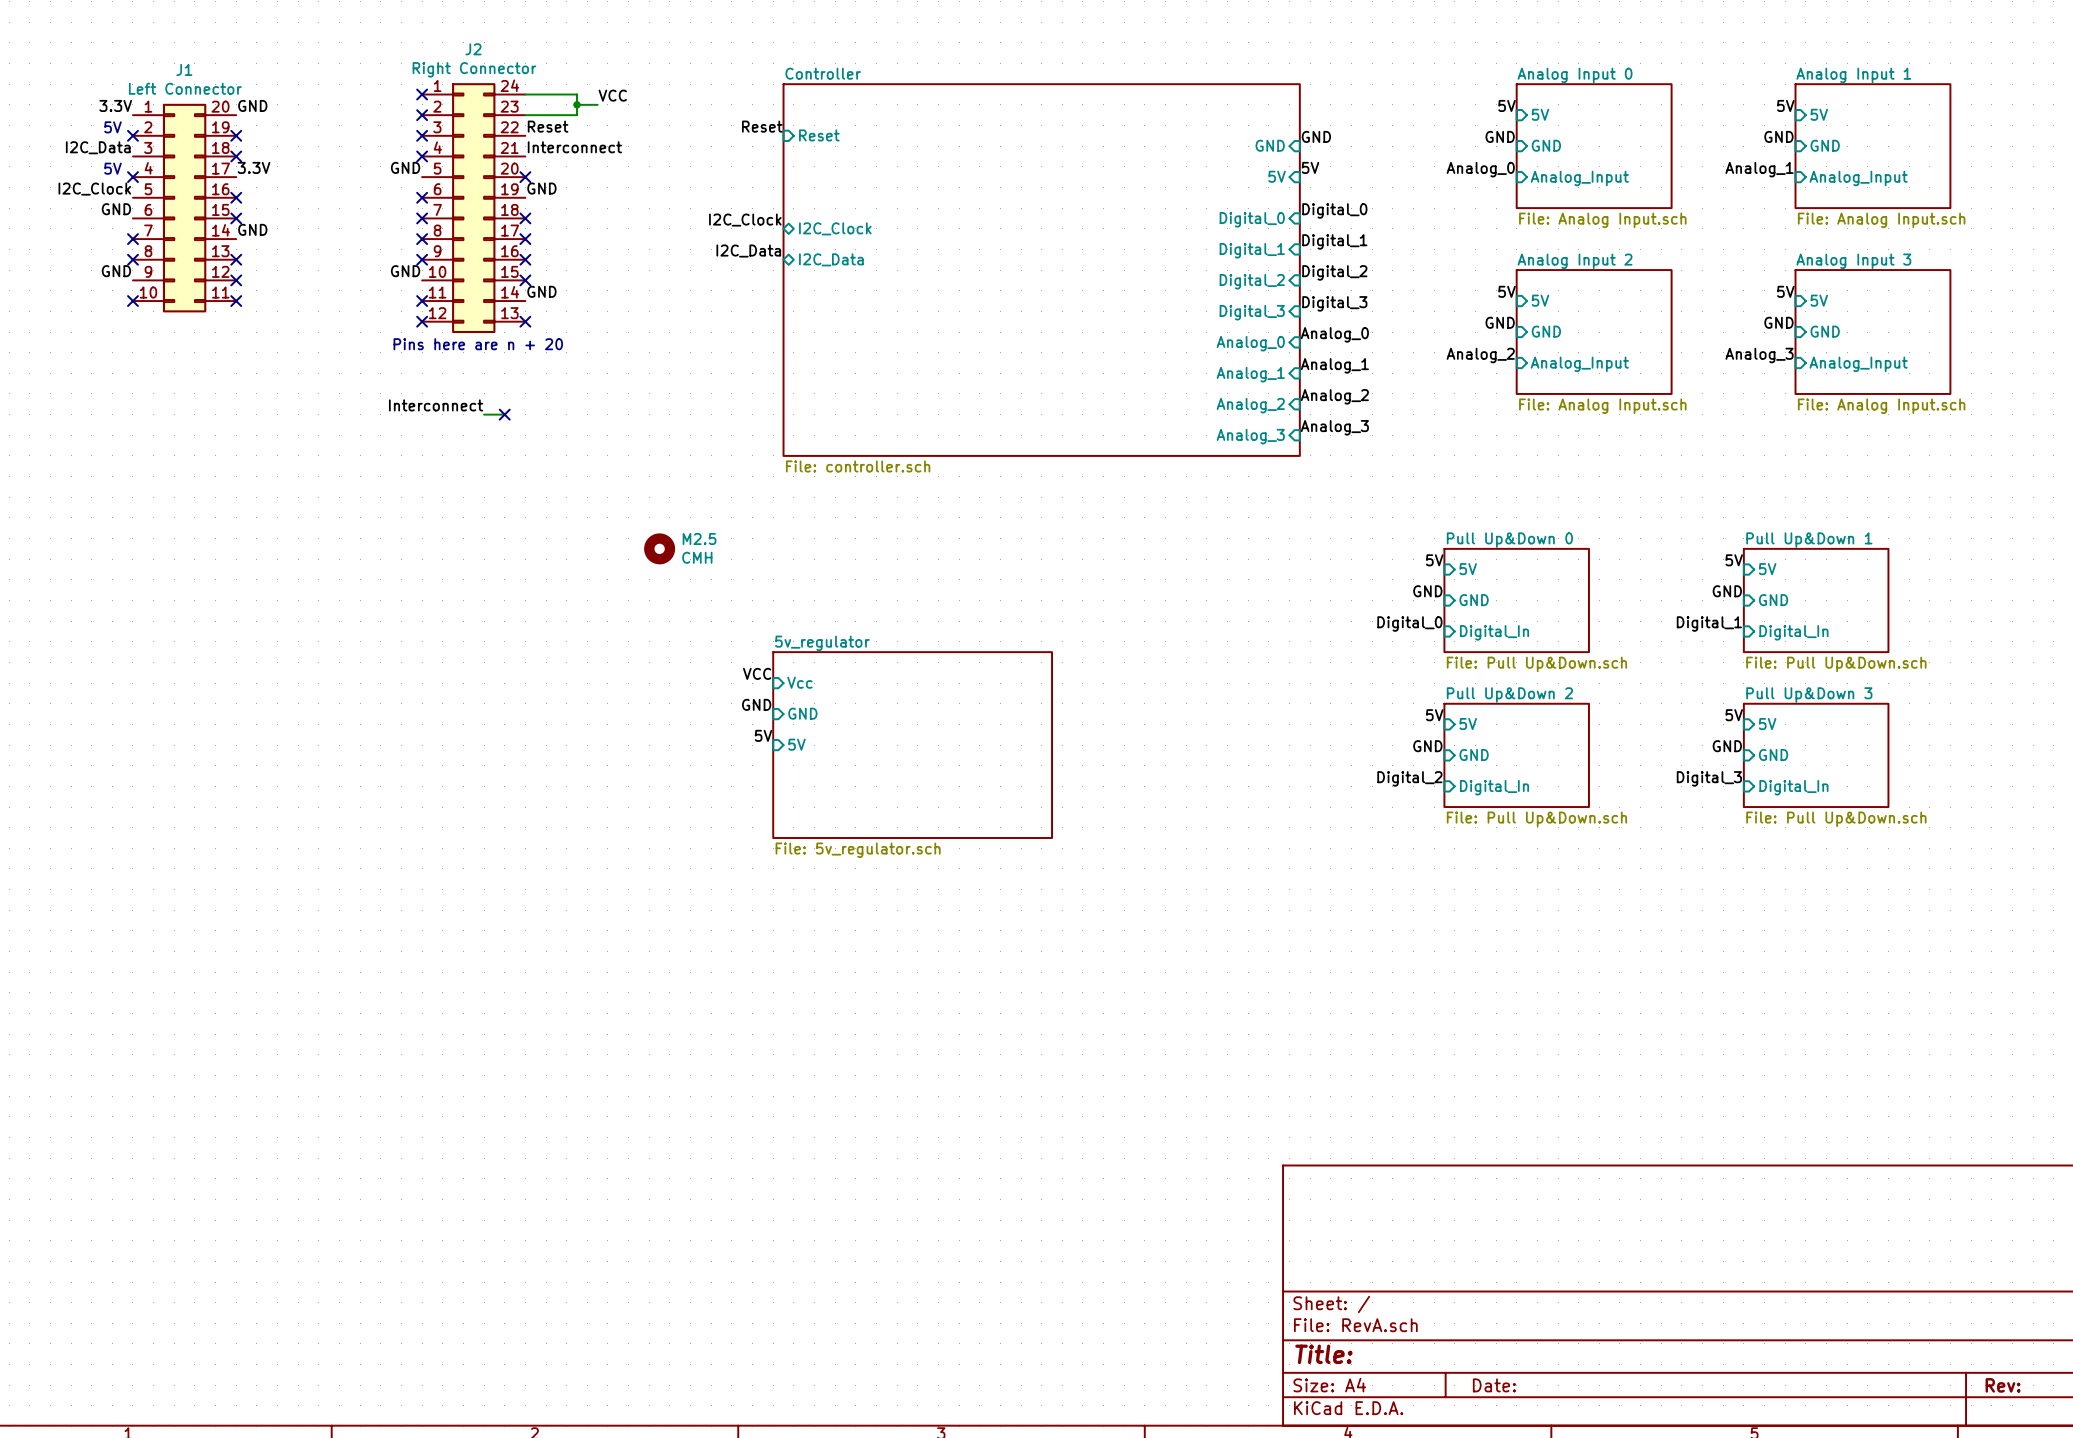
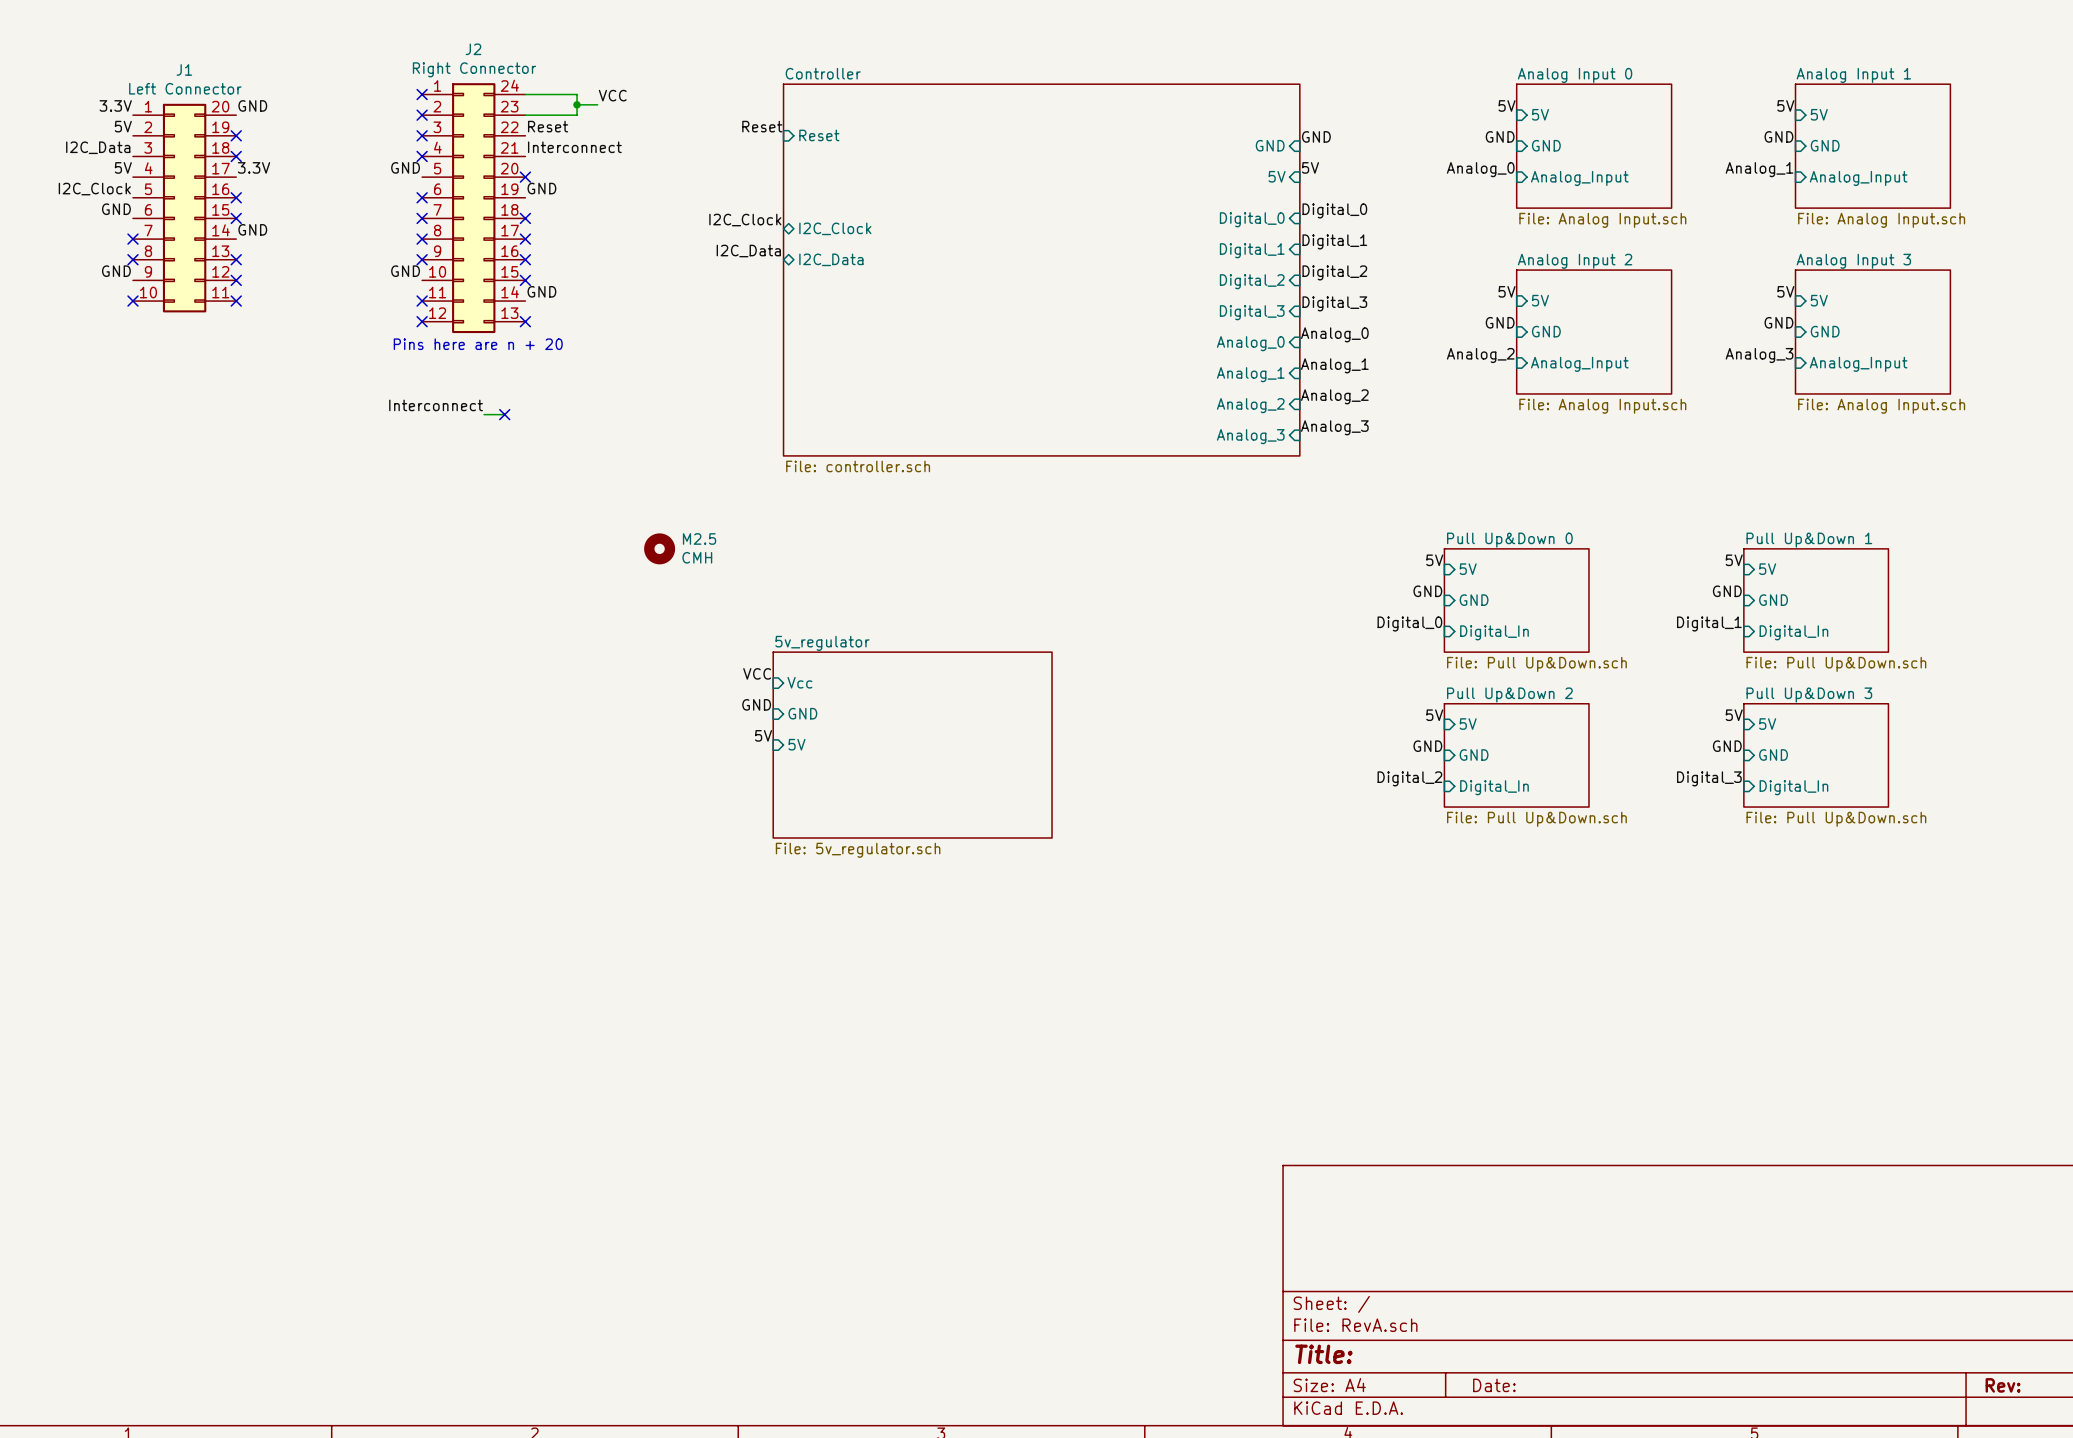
label: none -> 5V (123, 126)
text: 5V (112, 127) -> none
no-connect mark: (132, 135) -> none
label: none -> 5V (123, 167)
text: 5V (112, 168) -> none
no-connect mark: (132, 177) -> none

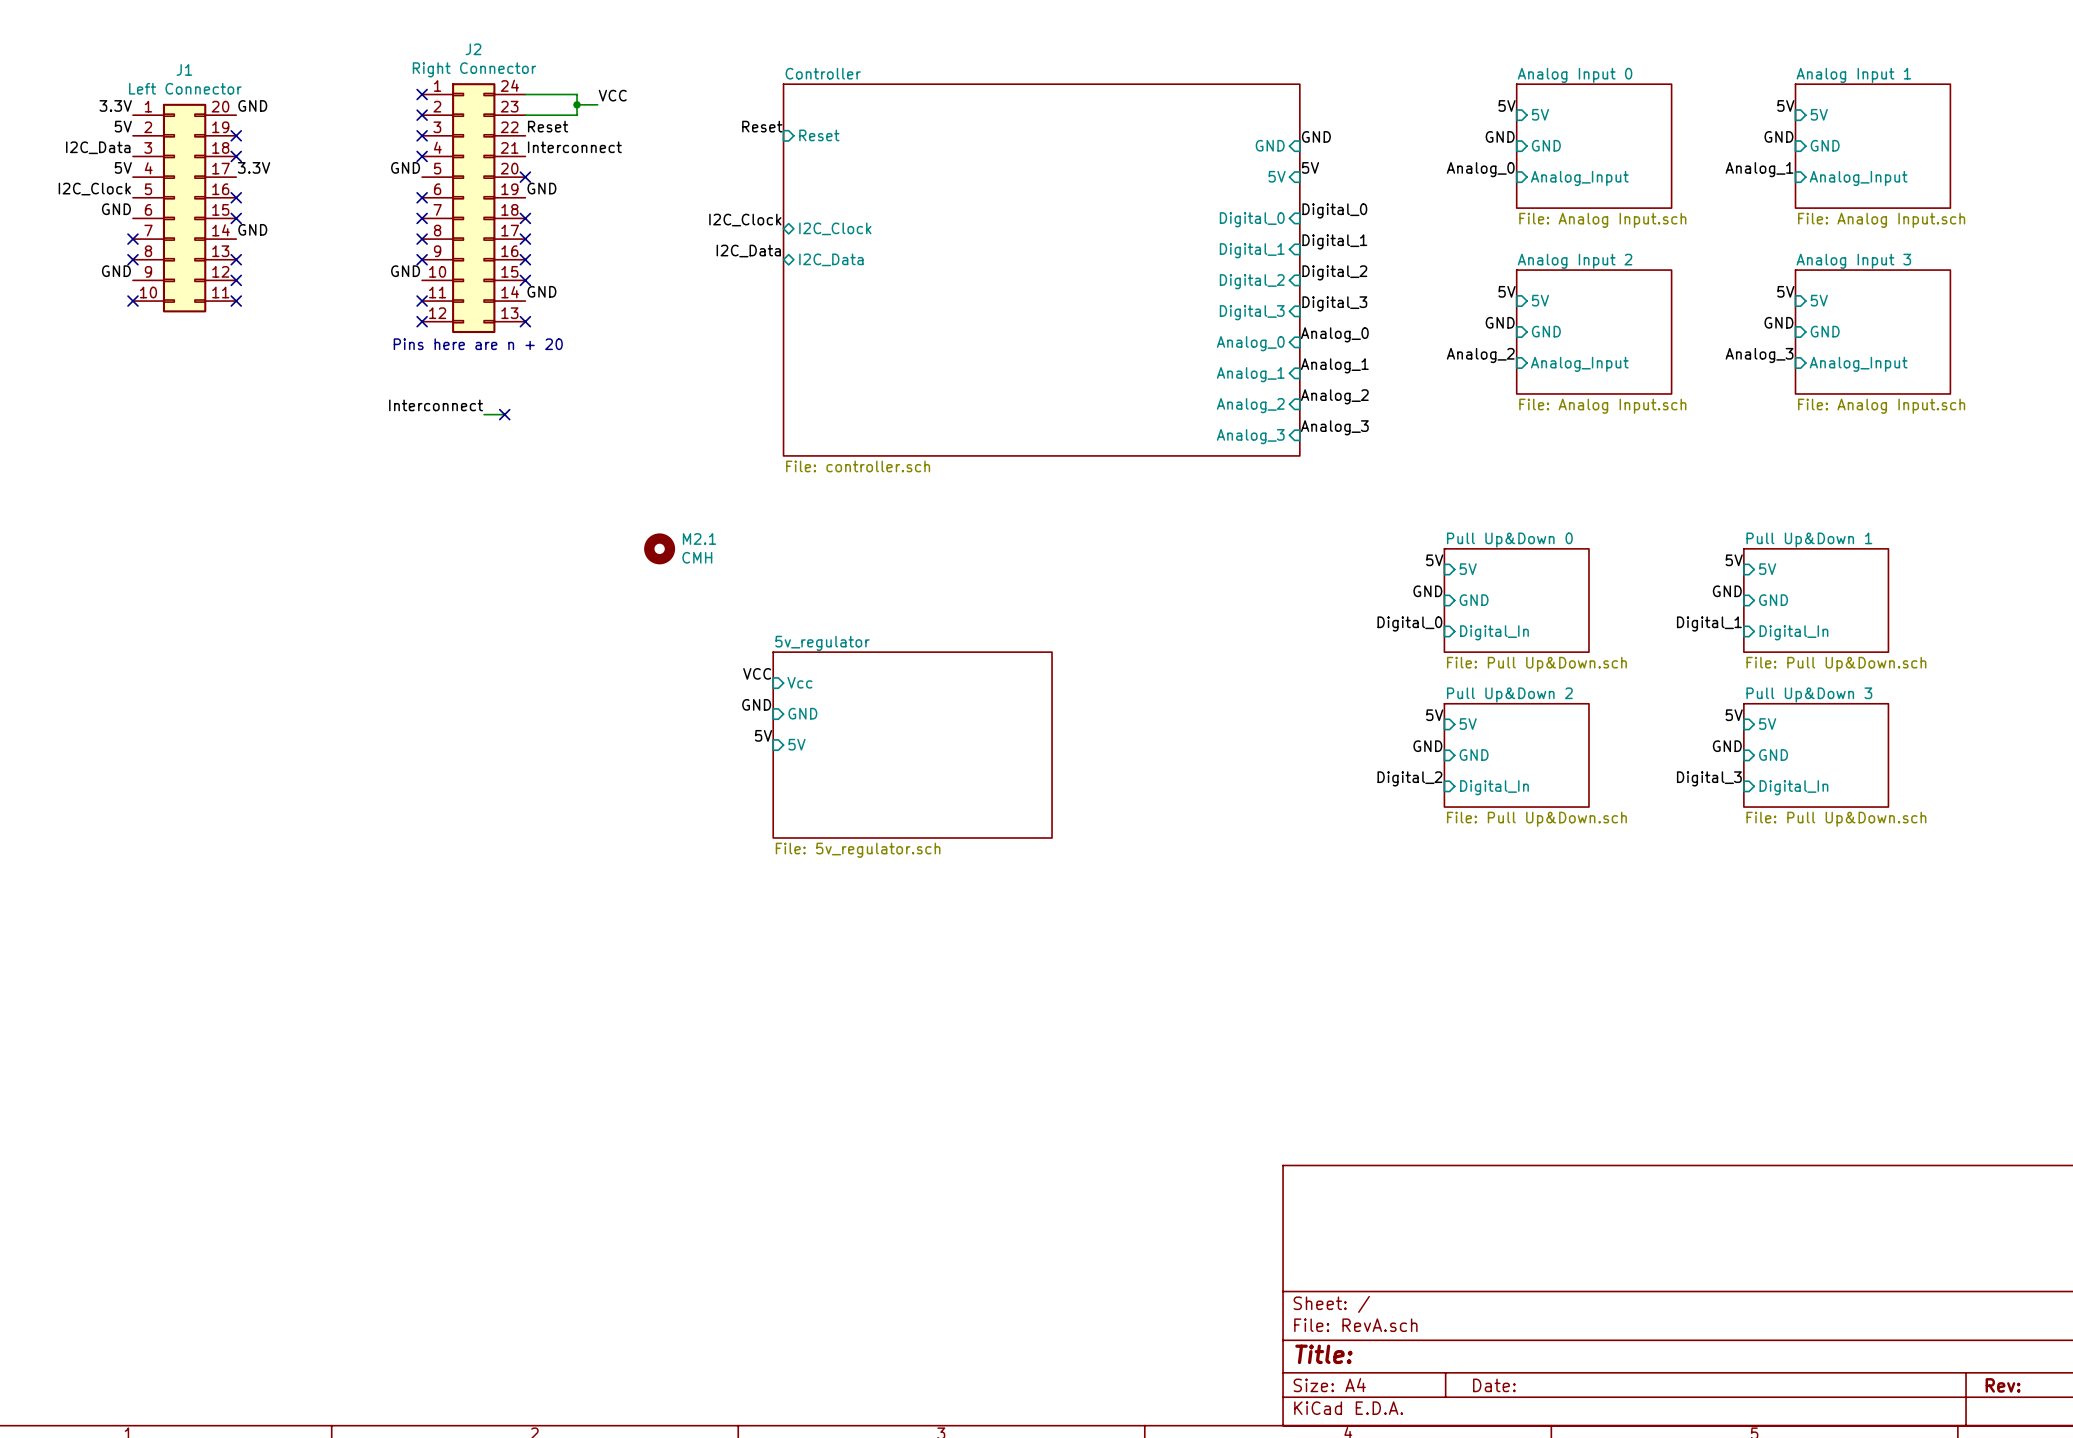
M2.5 name: M2.5 (699, 538) -> M2.1 (699, 538)

